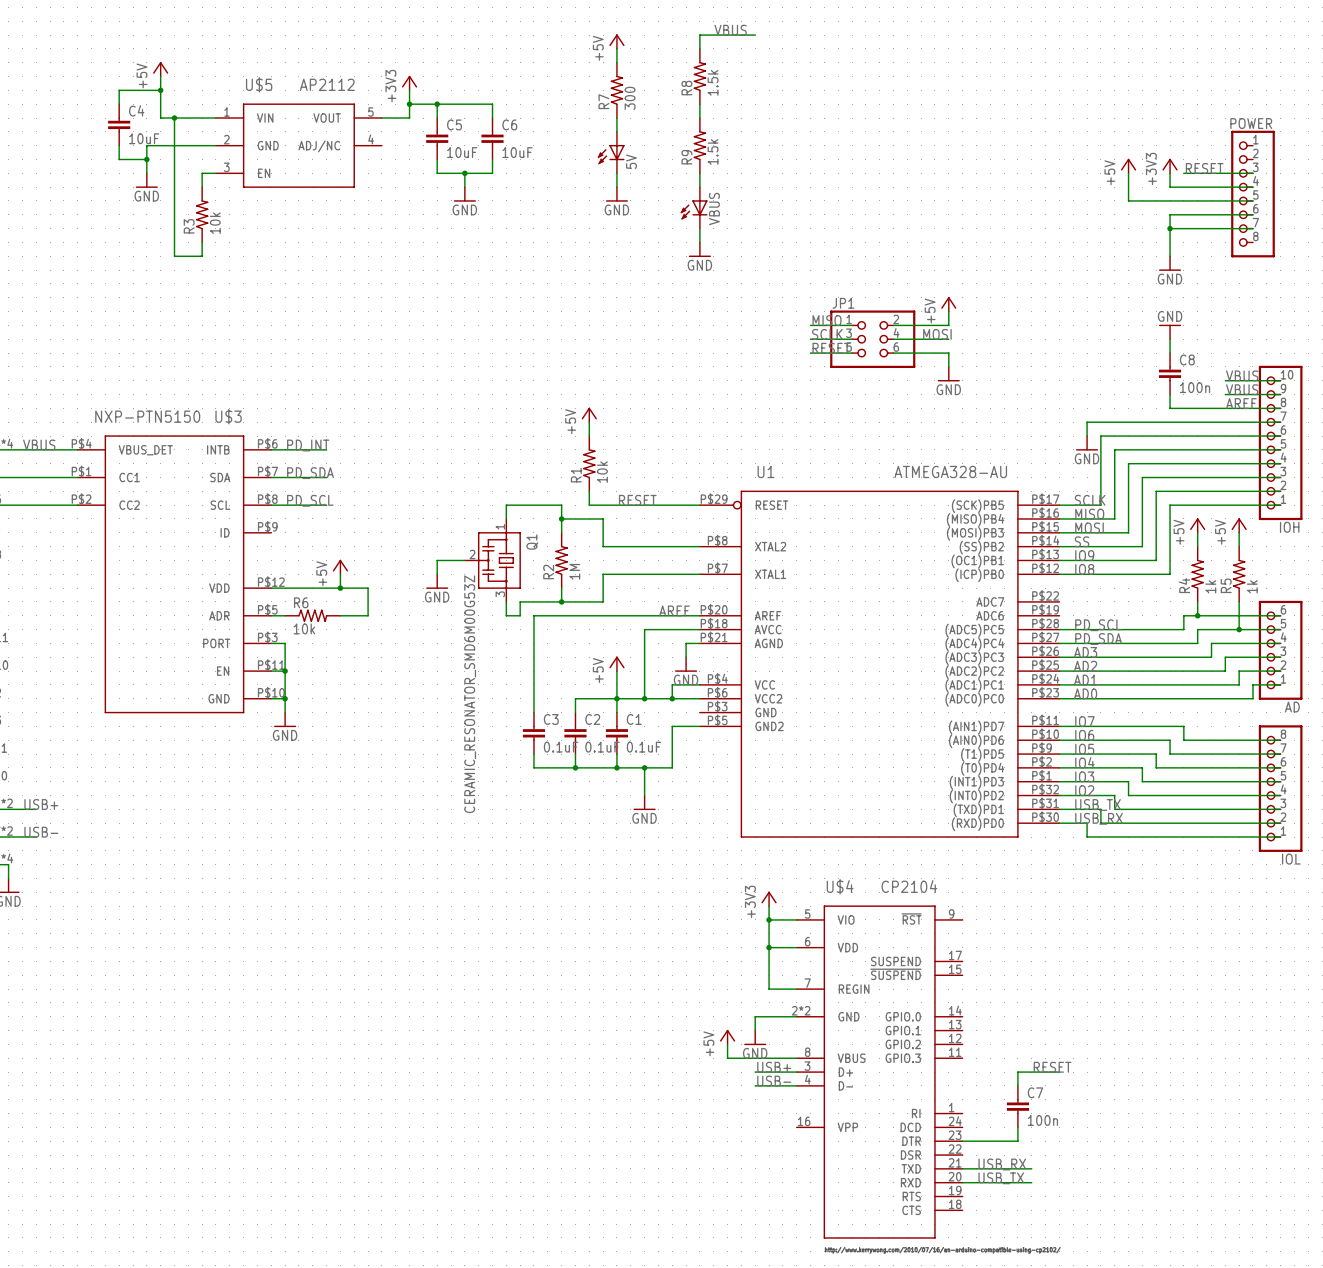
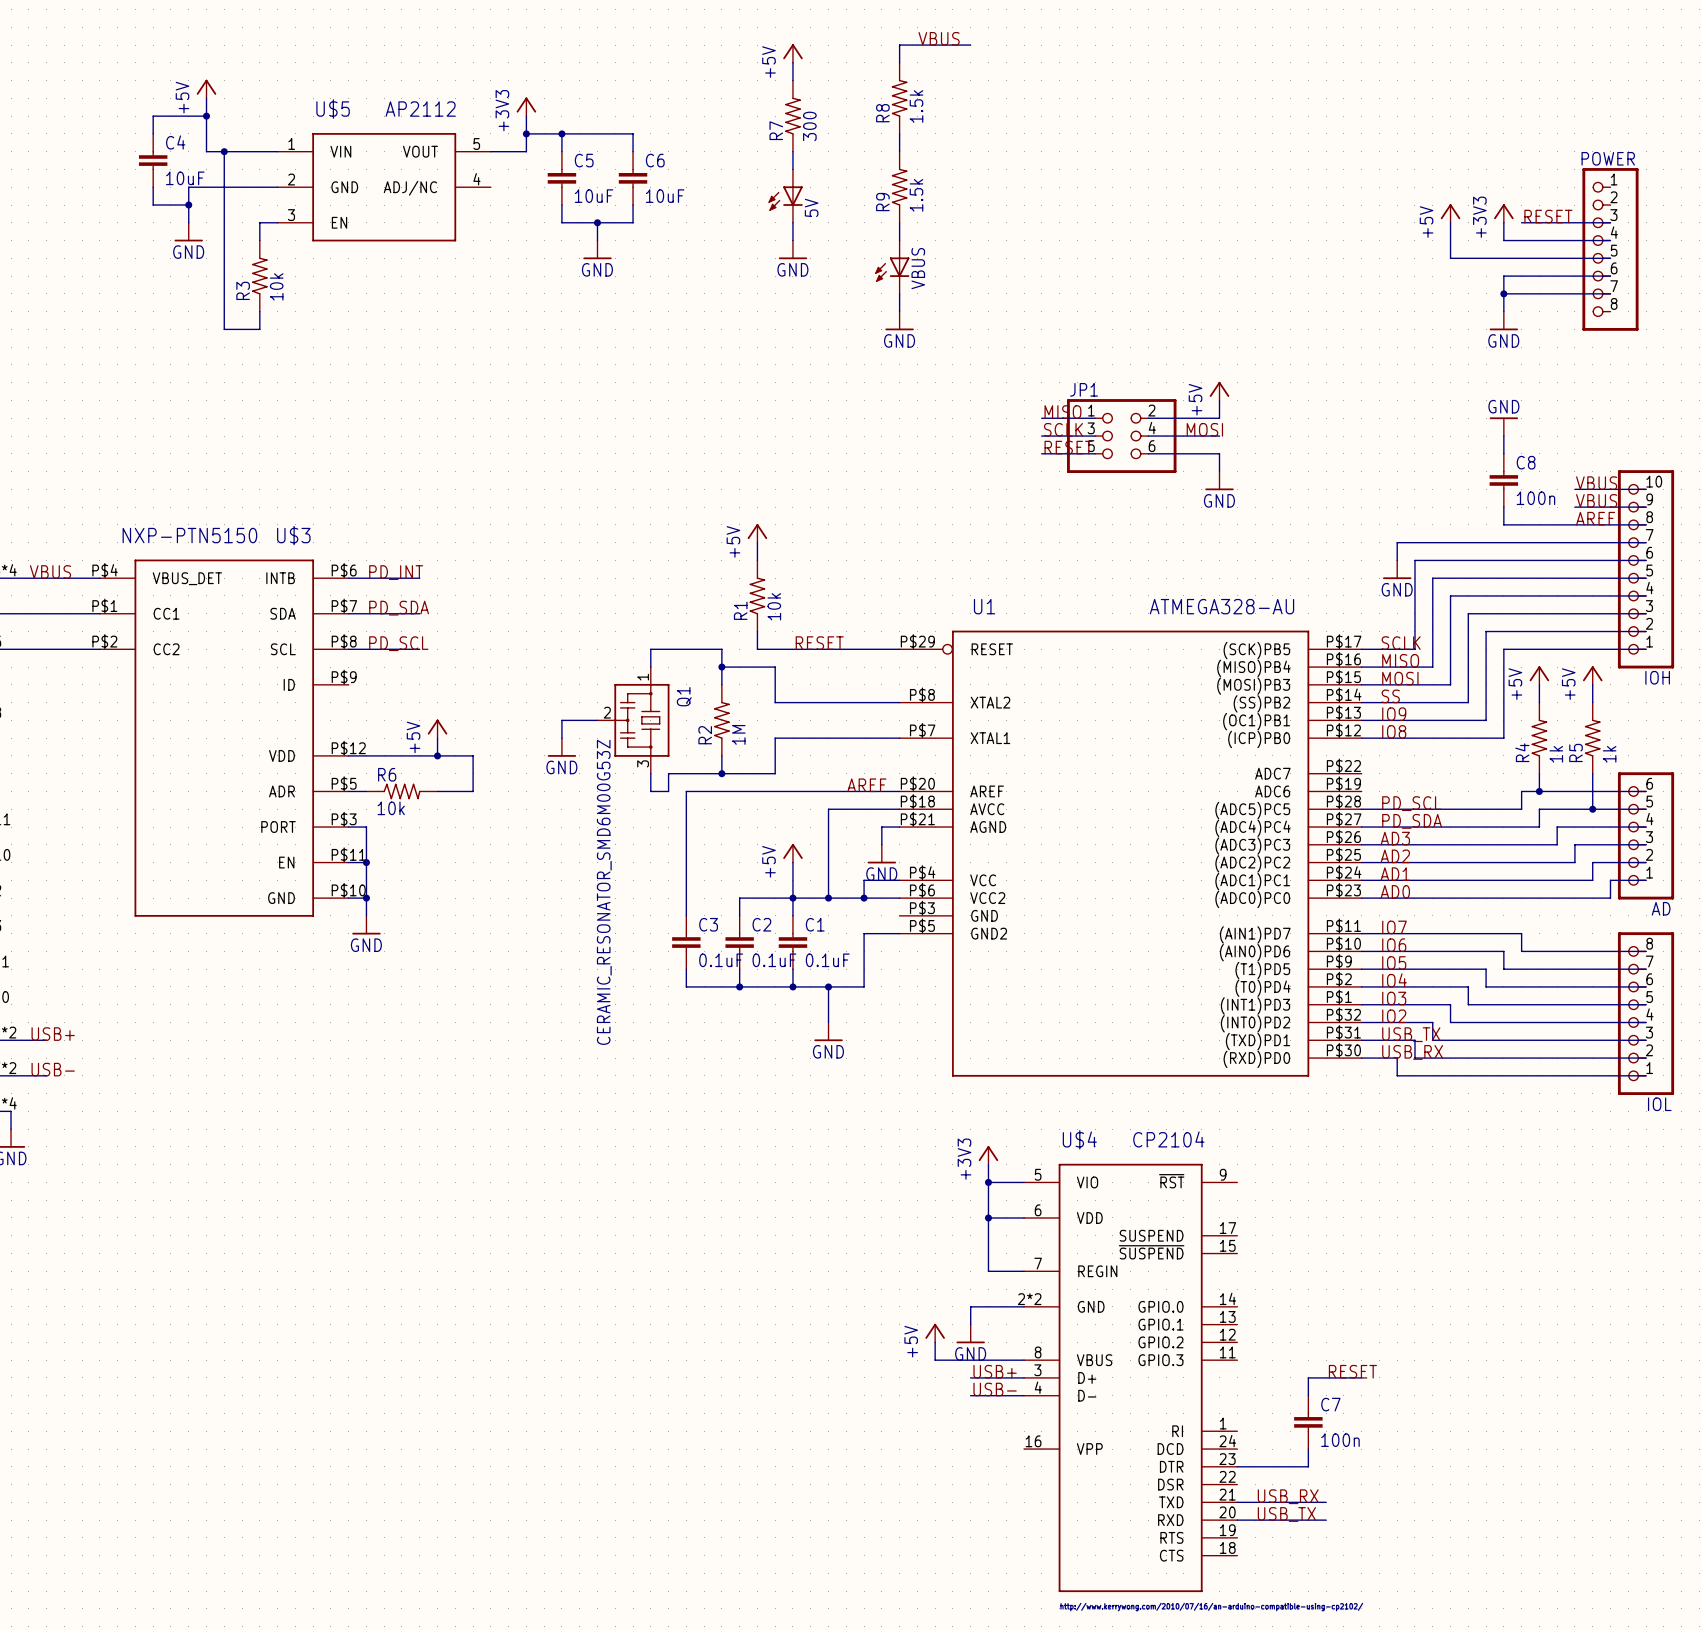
power symbol position: GND (1170, 263) -> GND (1503, 320)

